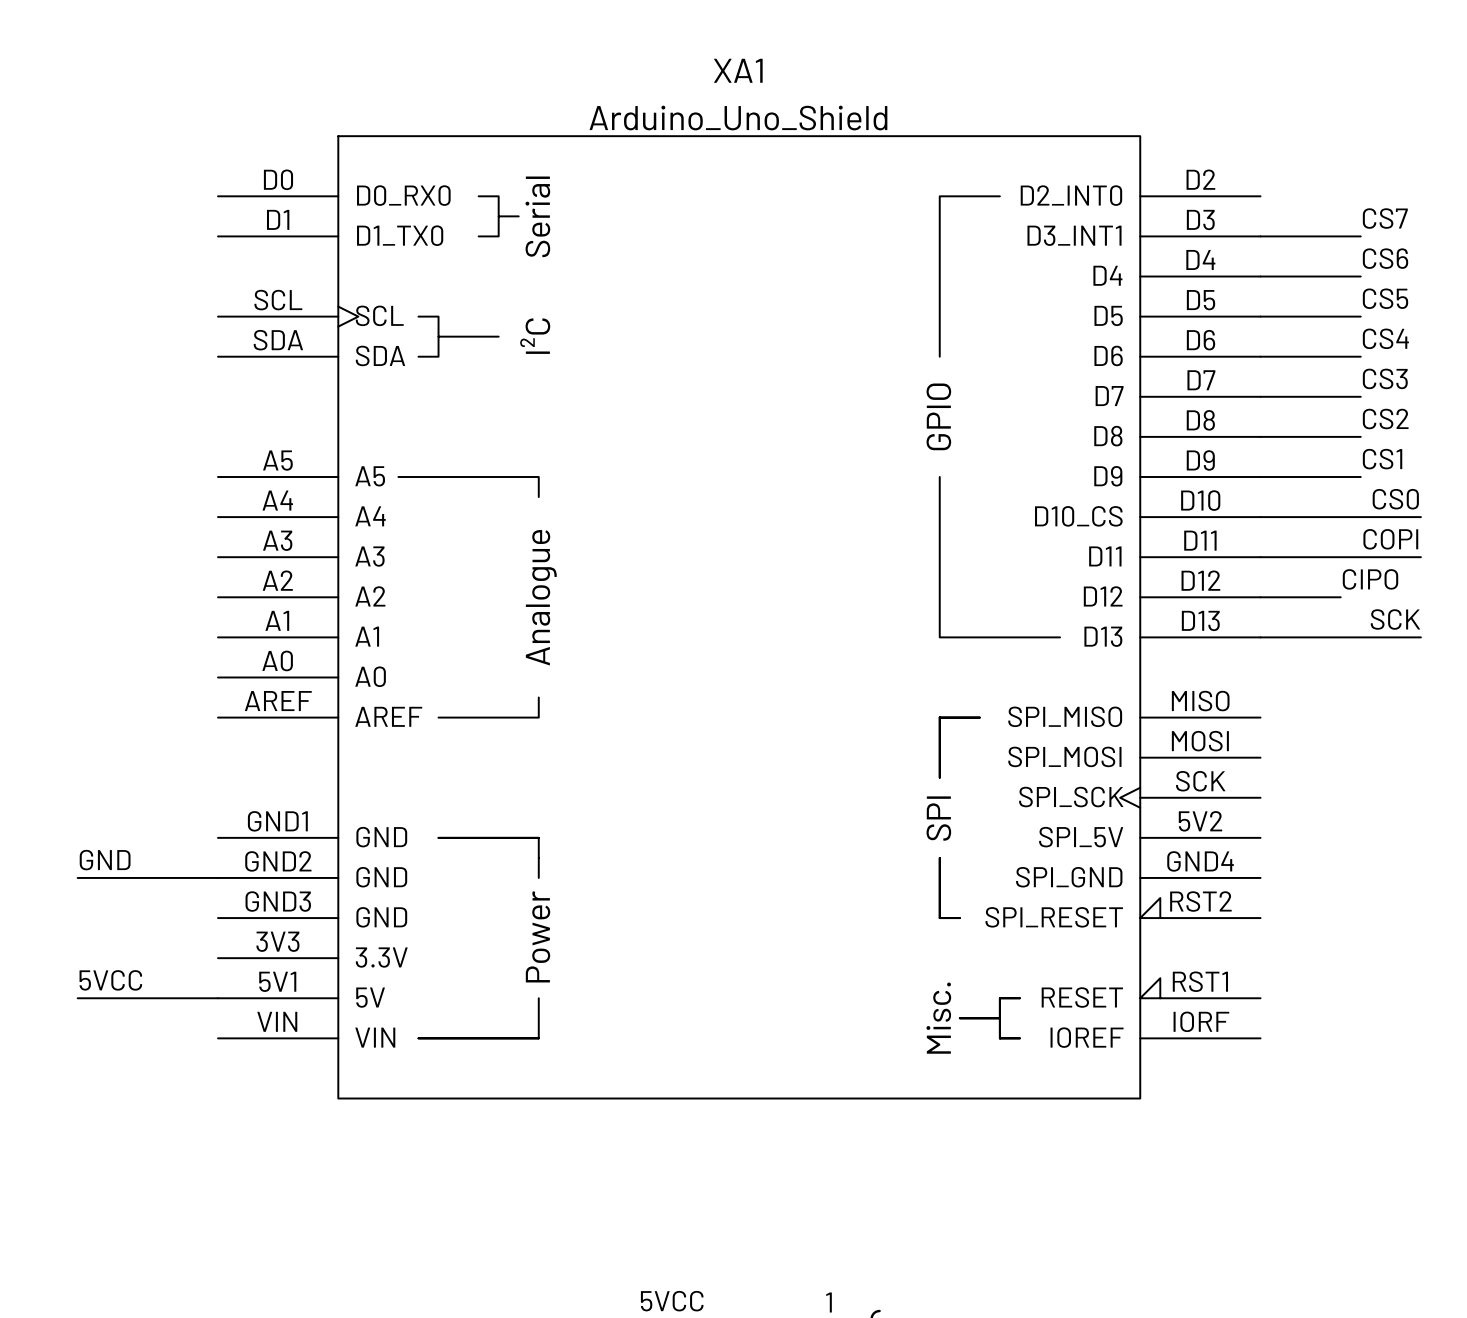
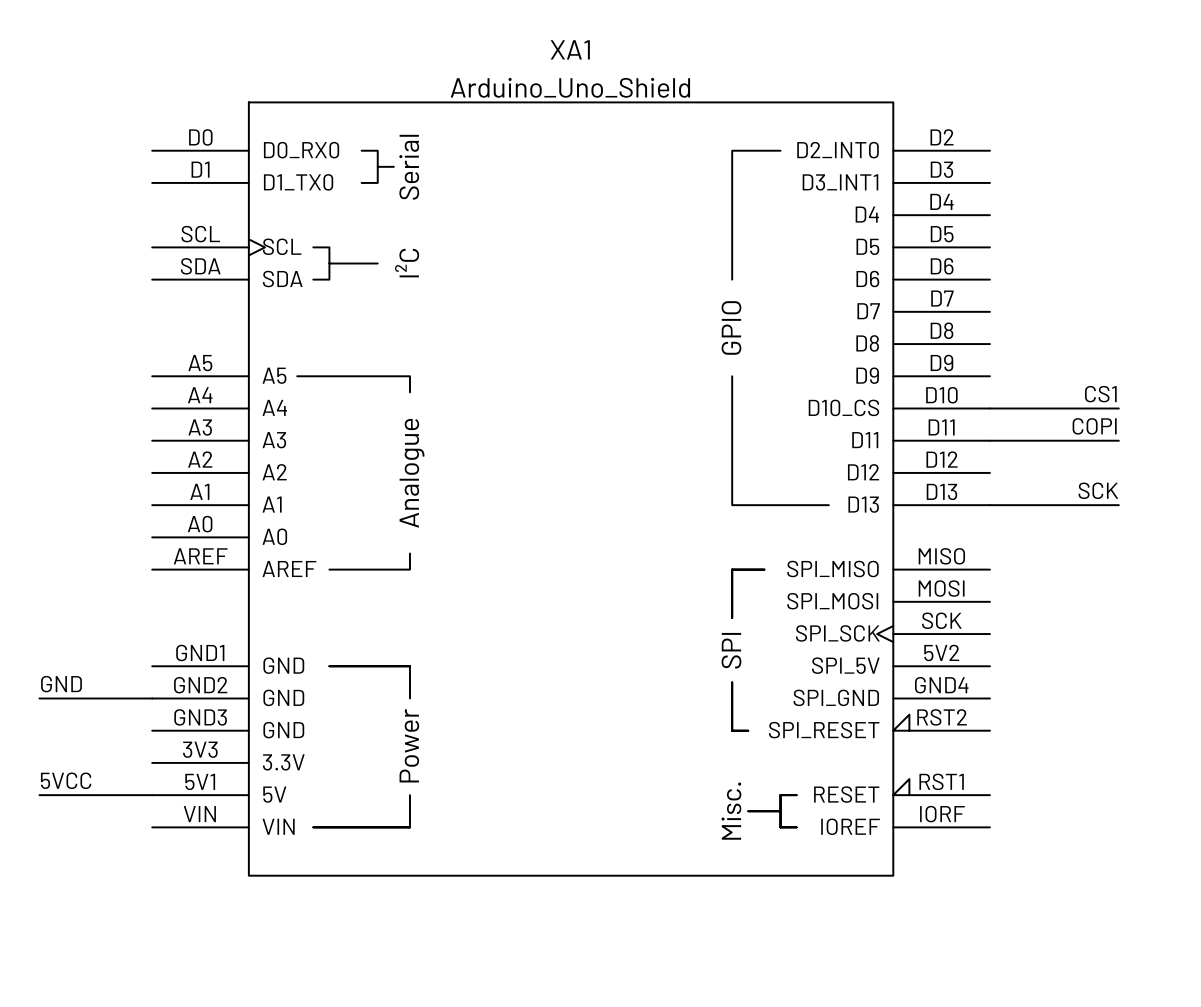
label: CS7 (1385, 218) -> none
wire: (1260, 236) (1360, 236) -> none
label: CS6 (1385, 258) -> none
wire: (1260, 276) (1360, 276) -> none
label: CS5 (1385, 298) -> none
wire: (1260, 316) (1360, 316) -> none
label: CS4 (1385, 338) -> none
wire: (1260, 356) (1360, 356) -> none
label: CS3 (1385, 378) -> none
wire: (1260, 396) (1360, 396) -> none
label: CS2 (1385, 419) -> none
wire: (1260, 436) (1360, 436) -> none
label: CS1 (1382, 459) -> none
wire: (1260, 476) (1360, 476) -> none
label: CS0 (1395, 499) -> CS1 (1100, 394)
label: CIPO (1370, 579) -> none
wire: (1260, 597) (1340, 597) -> none

